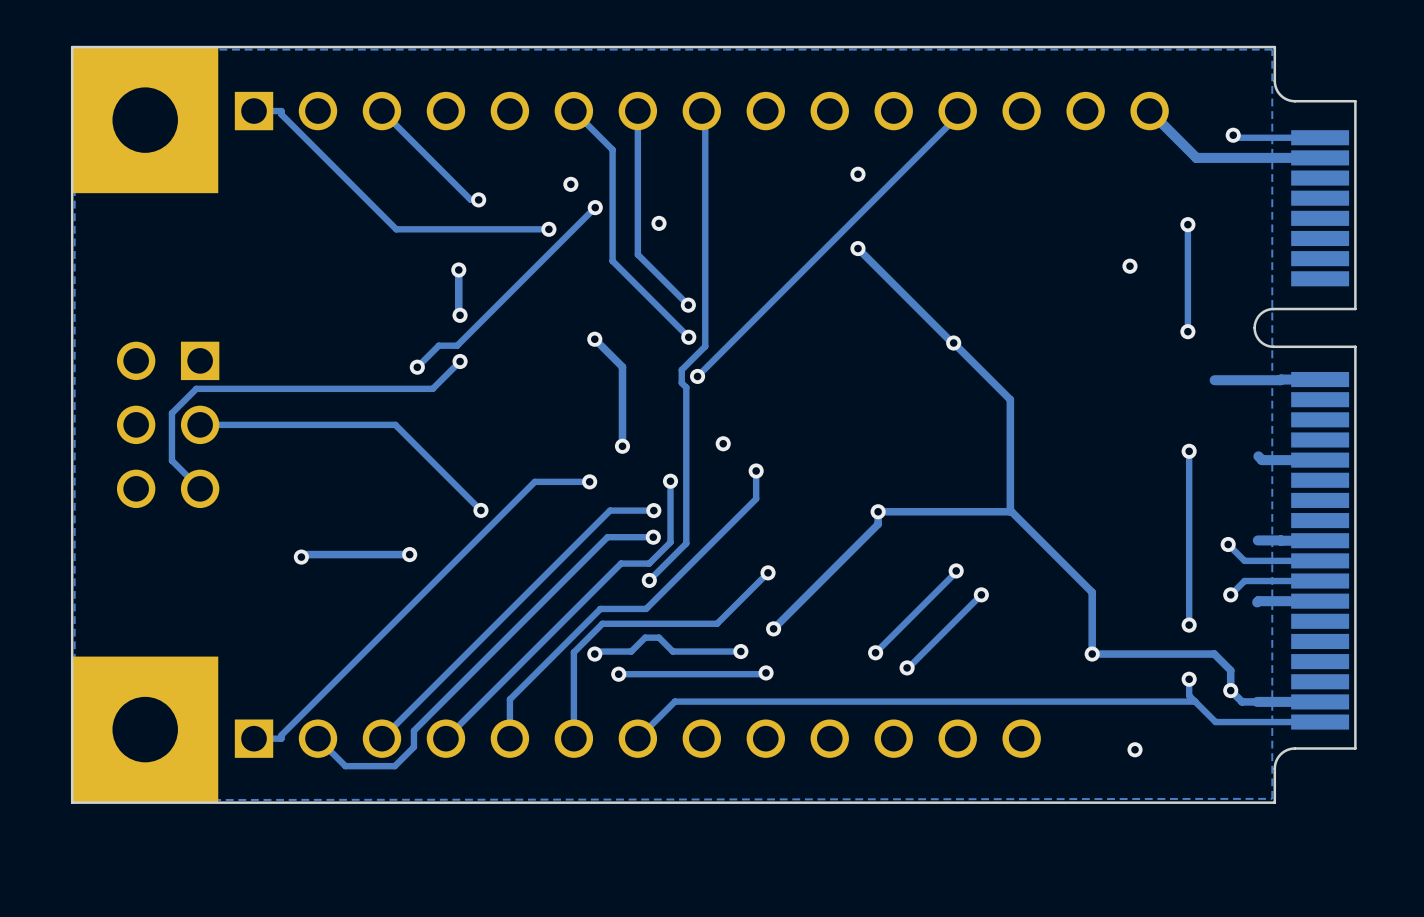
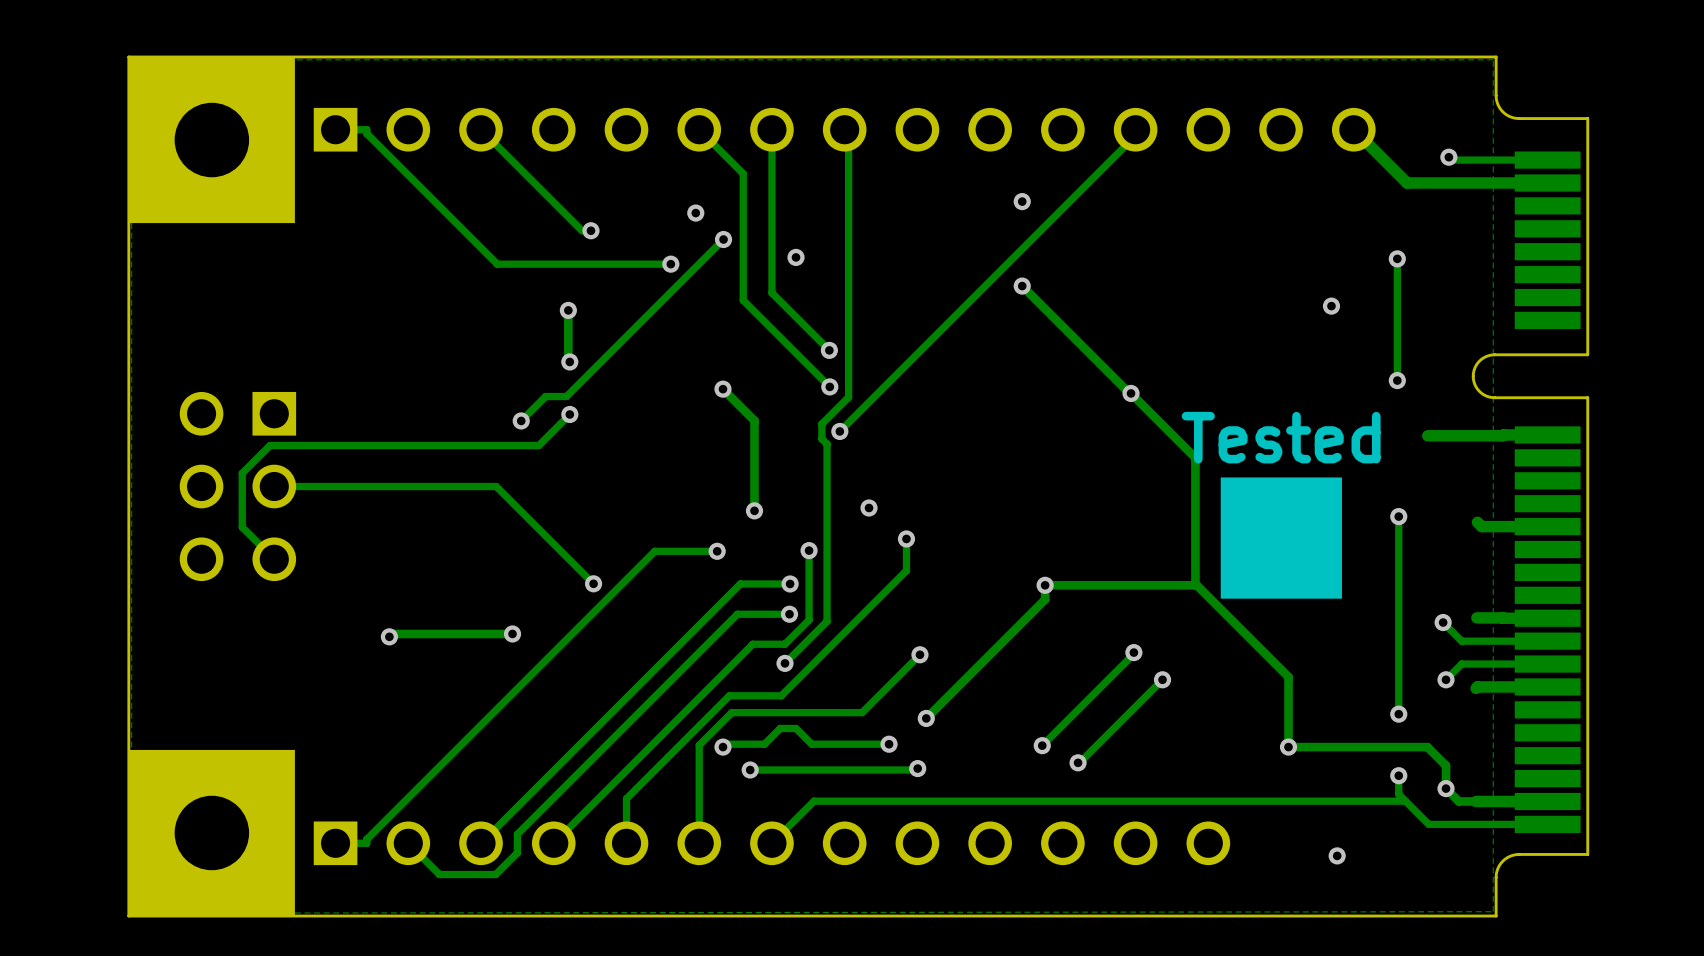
text: none -> Tested (1281, 437)
drawing: none -> [1220, 477, 1342, 599]

